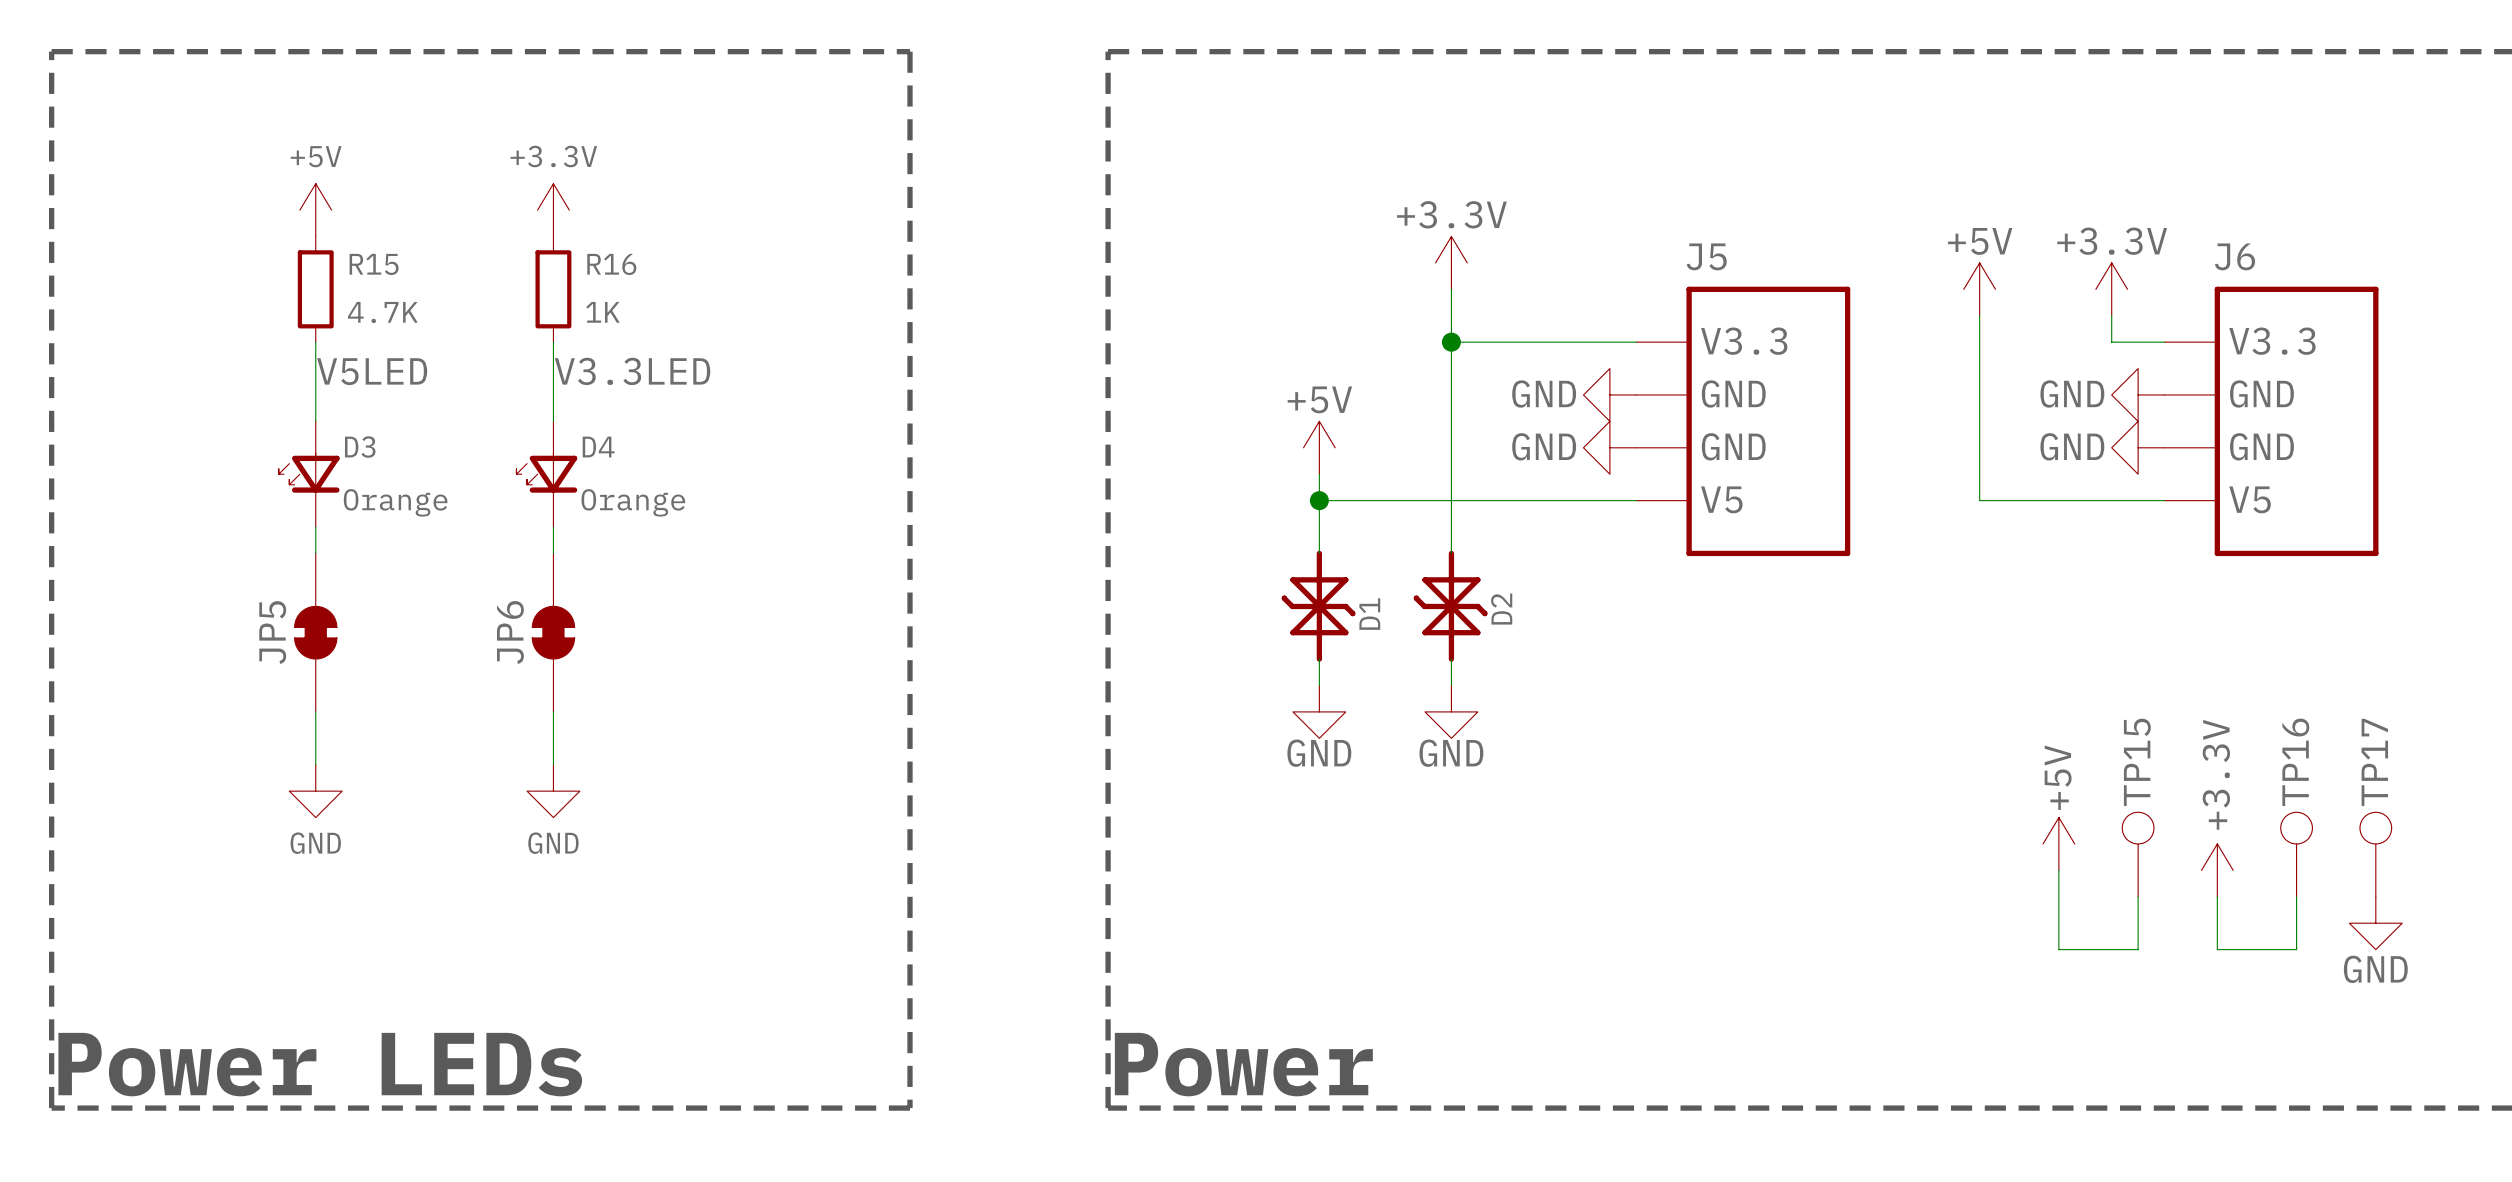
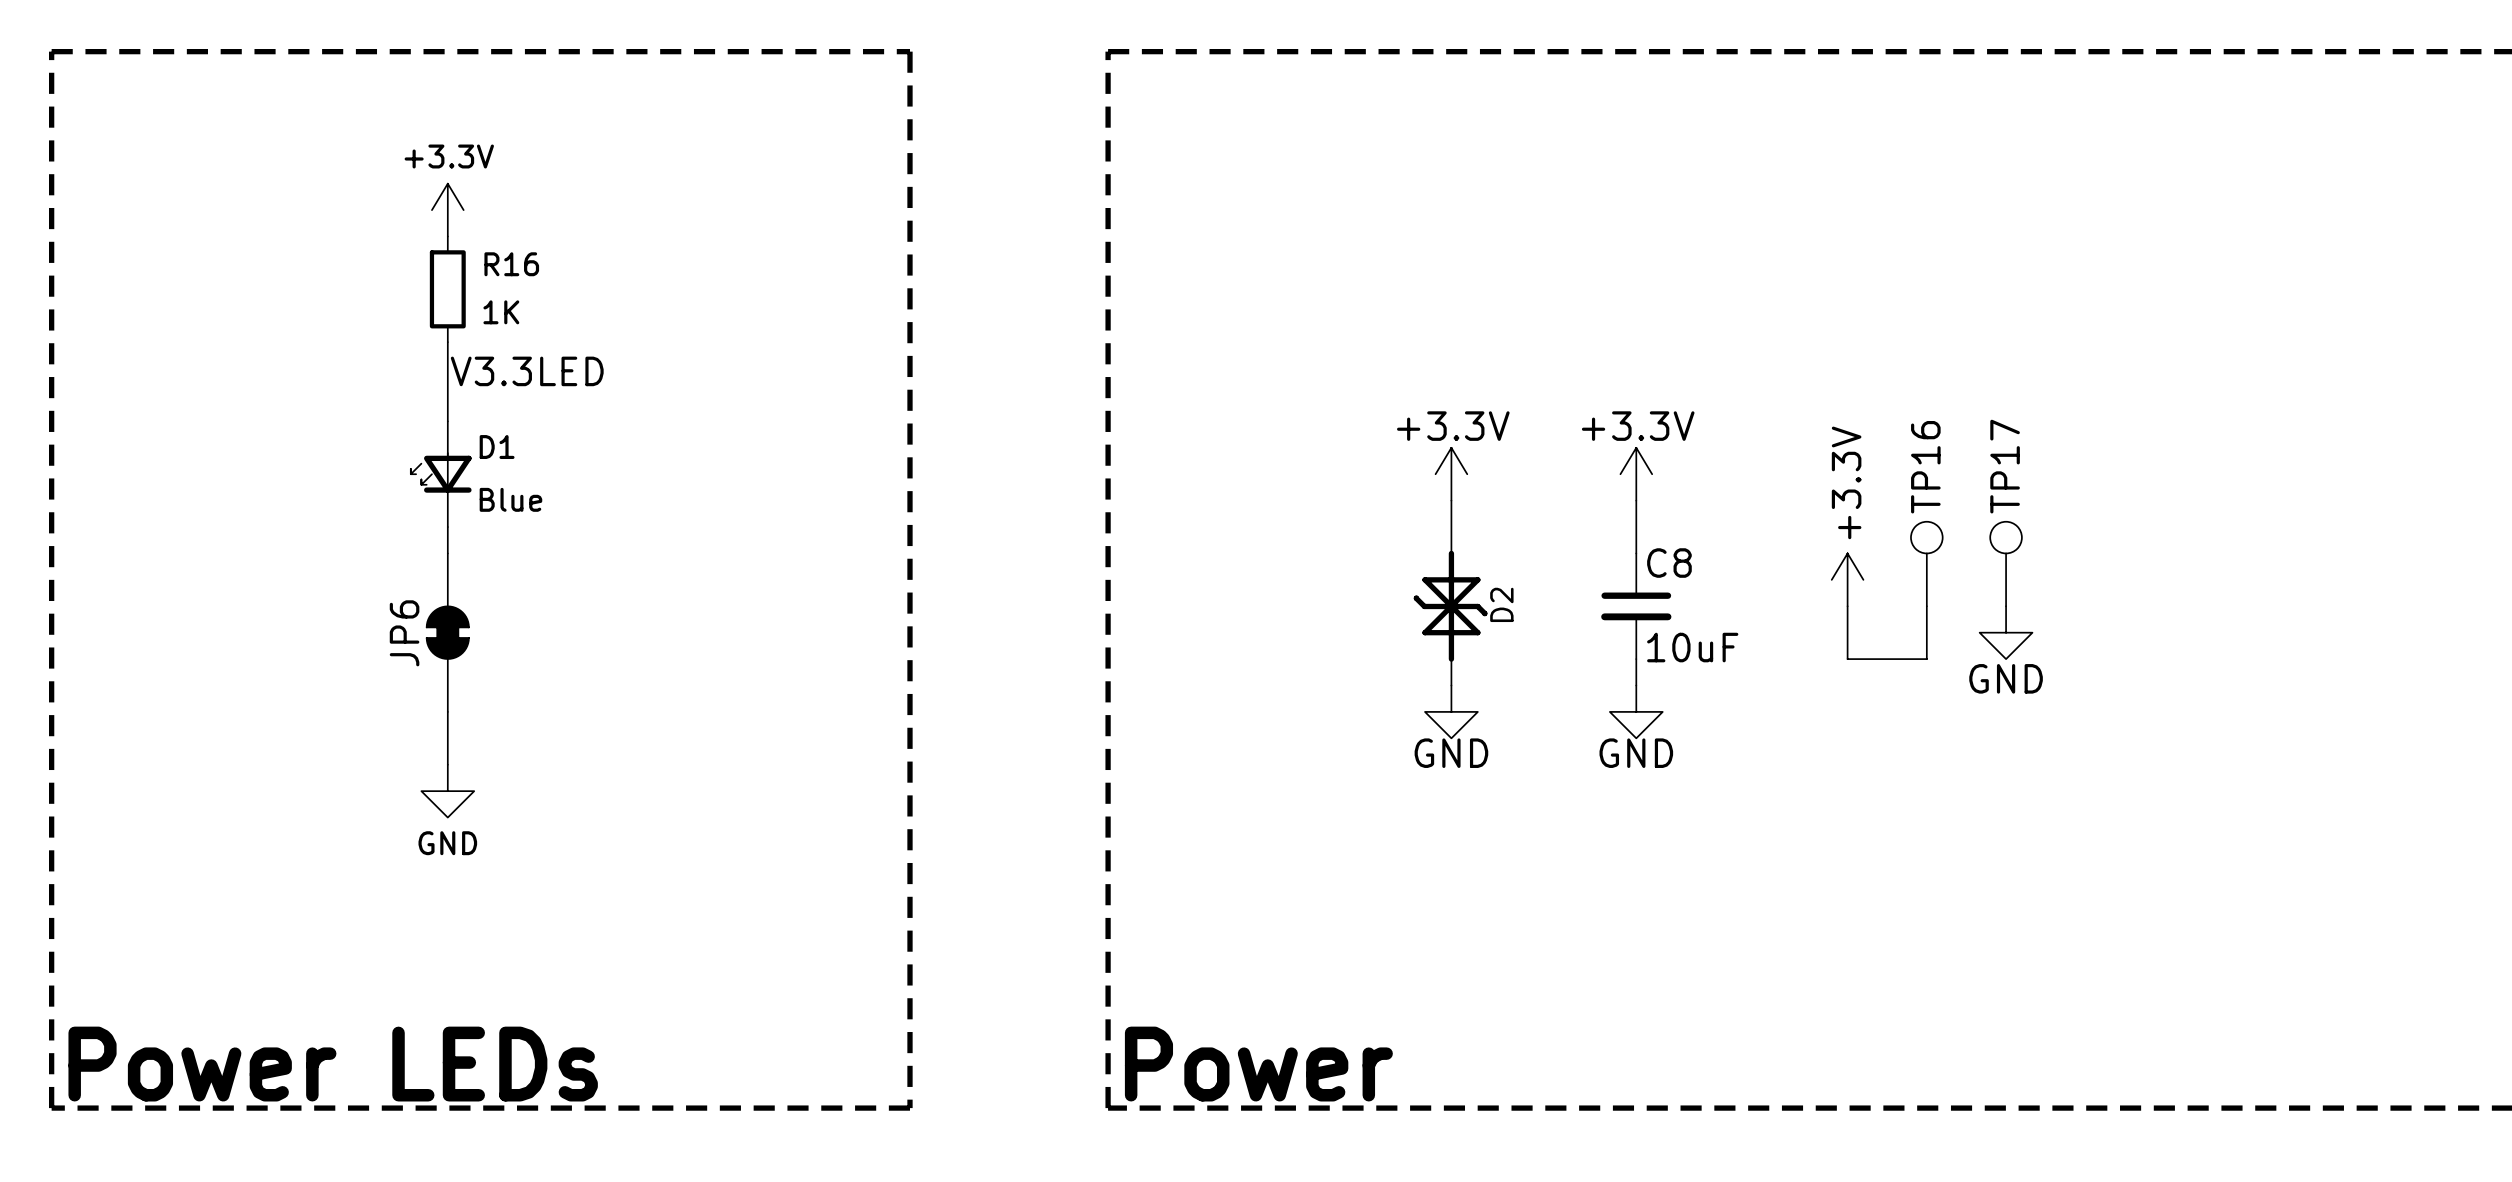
power symbol: +5V (315, 210) -> none
power symbol position: +3.3V (553, 210) -> +3.3V (447, 210)
power symbol: +3.3V (1451, 262) -> none
R15: 4.7K (315, 289) -> none
R16 position: (553, 289) -> (447, 289)
wire: (1451, 289) (1451, 500) -> none
power symbol: +5V (1979, 289) -> none
power symbol: +3.3V (2111, 289) -> none
wire: (1979, 315) (1979, 500) (2164, 500) -> none
wire: (2111, 315) (2111, 342) (2164, 342) -> none
wire: (315, 342) (315, 421) -> none
wire: (553, 342) (553, 421) -> (447, 342) (447, 421)
wire: (1451, 342) (1636, 342) -> none
junction: (1451, 342) -> none
label: V5LED (372, 371) -> none
label position: V3.3LED (632, 371) -> V3.3LED (527, 371)
power symbol: GND (1609, 394) -> none
power symbol: GND (2138, 394) -> none
J5: (1743, 421) -> none
J6: (2271, 421) -> none
power symbol: +5V (1319, 447) -> none
power symbol: GND (1609, 447) -> none
power symbol: GND (2138, 447) -> none
D3: Orange (309, 474) -> none
D4: Orange (546, 474) -> none
wire: (1319, 474) (1319, 553) -> none
power symbol: none -> +3.3V (1451, 474)
power symbol: none -> +3.3V (1636, 474)
D1 value: none -> Blue (510, 499)
wire: (1319, 500) (1636, 500) -> (1636, 553) (1636, 500)
junction: (1319, 500) -> none
wire: (315, 527) (315, 553) -> none
wire: (553, 527) (553, 553) -> (447, 527) (447, 553)
D1 symbol: [1281, 550, 1356, 662] -> [410, 421, 472, 528]
power symbol: none -> +3.3V (1847, 579)
C8: none -> 10uF (1636, 606)
JP5: (315, 632) -> none
JP6 position: (553, 632) -> (447, 632)
power symbol: none -> GND (2006, 632)
wire: (1319, 659) (1319, 685) -> (1636, 659) (1636, 685)
wire: (315, 711) (315, 764) -> none
wire: (553, 711) (553, 764) -> (447, 711) (447, 764)
power symbol: GND (1319, 711) -> none
power symbol: none -> GND (1636, 711)
power symbol: GND (315, 791) -> none
power symbol: none -> GND (447, 791)
power symbol: GND (553, 791) -> none
power symbol: +5V (2058, 843) -> none
TP15: (2138, 854) -> none
TP16 position: (2296, 854) -> (1926, 564)
TP17 position: (2375, 854) -> (2006, 564)
wire: (2058, 870) (2058, 949) (2138, 949) (2138, 896) -> none
power symbol: +3.3V (2217, 870) -> none
wire: (2217, 896) (2217, 949) (2296, 949) (2296, 896) -> (1847, 606) (1847, 659) (1926, 659) (1926, 606)
power symbol: GND (2375, 923) -> none

